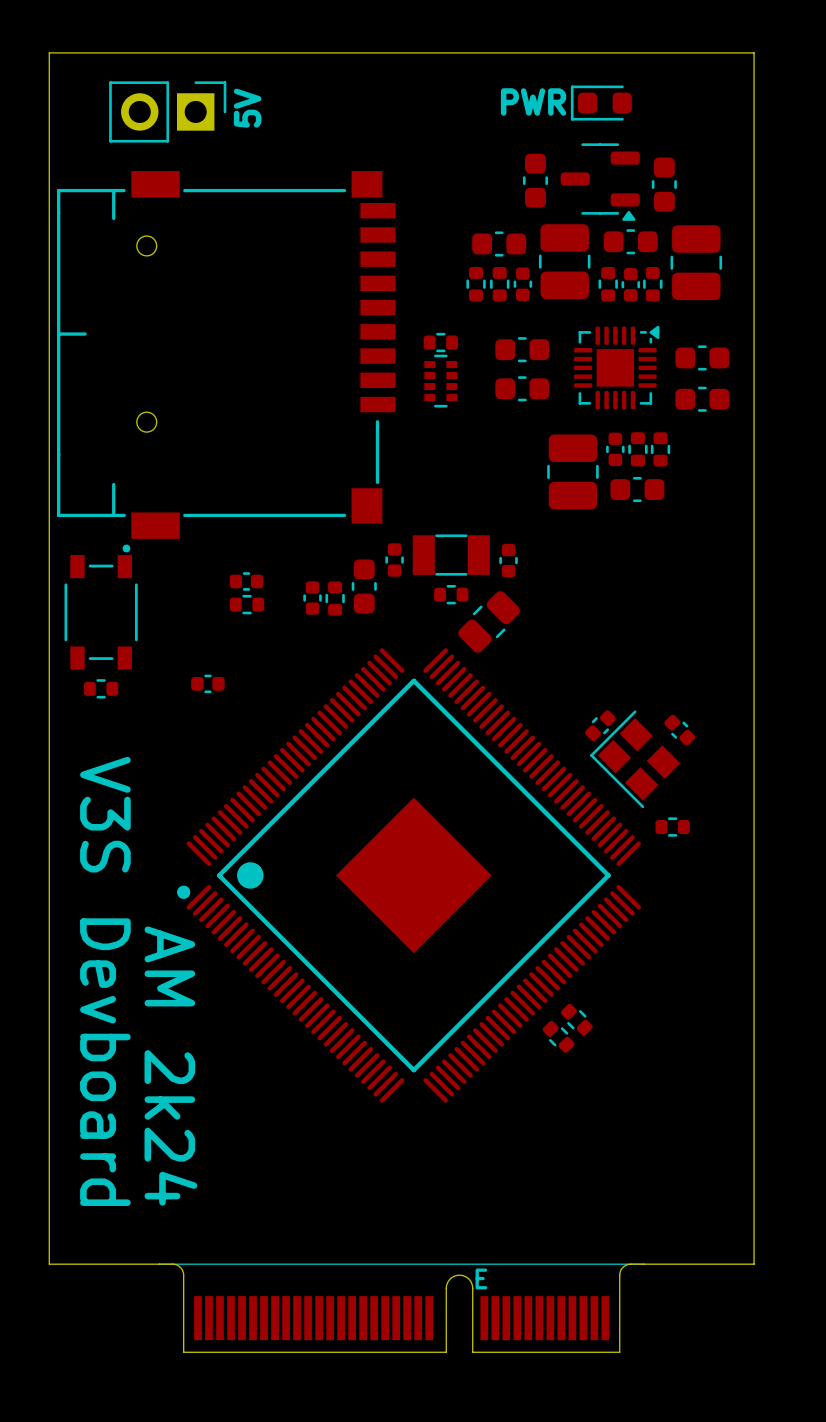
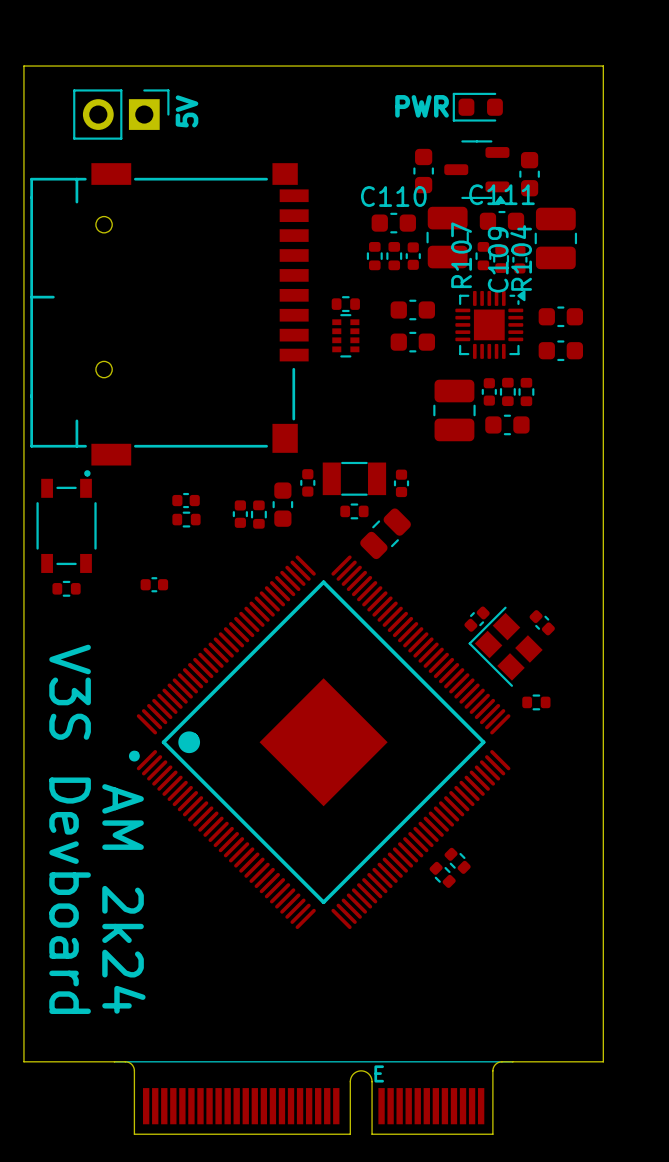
C111 name: none -> C111 (501, 194)
C110 name: none -> C110 (393, 196)
R107 name: none -> R107 (461, 255)
part: (630, 284) -> none
part: (652, 284) -> none
R104: none -> (501, 258)
C109: none -> (519, 259)

